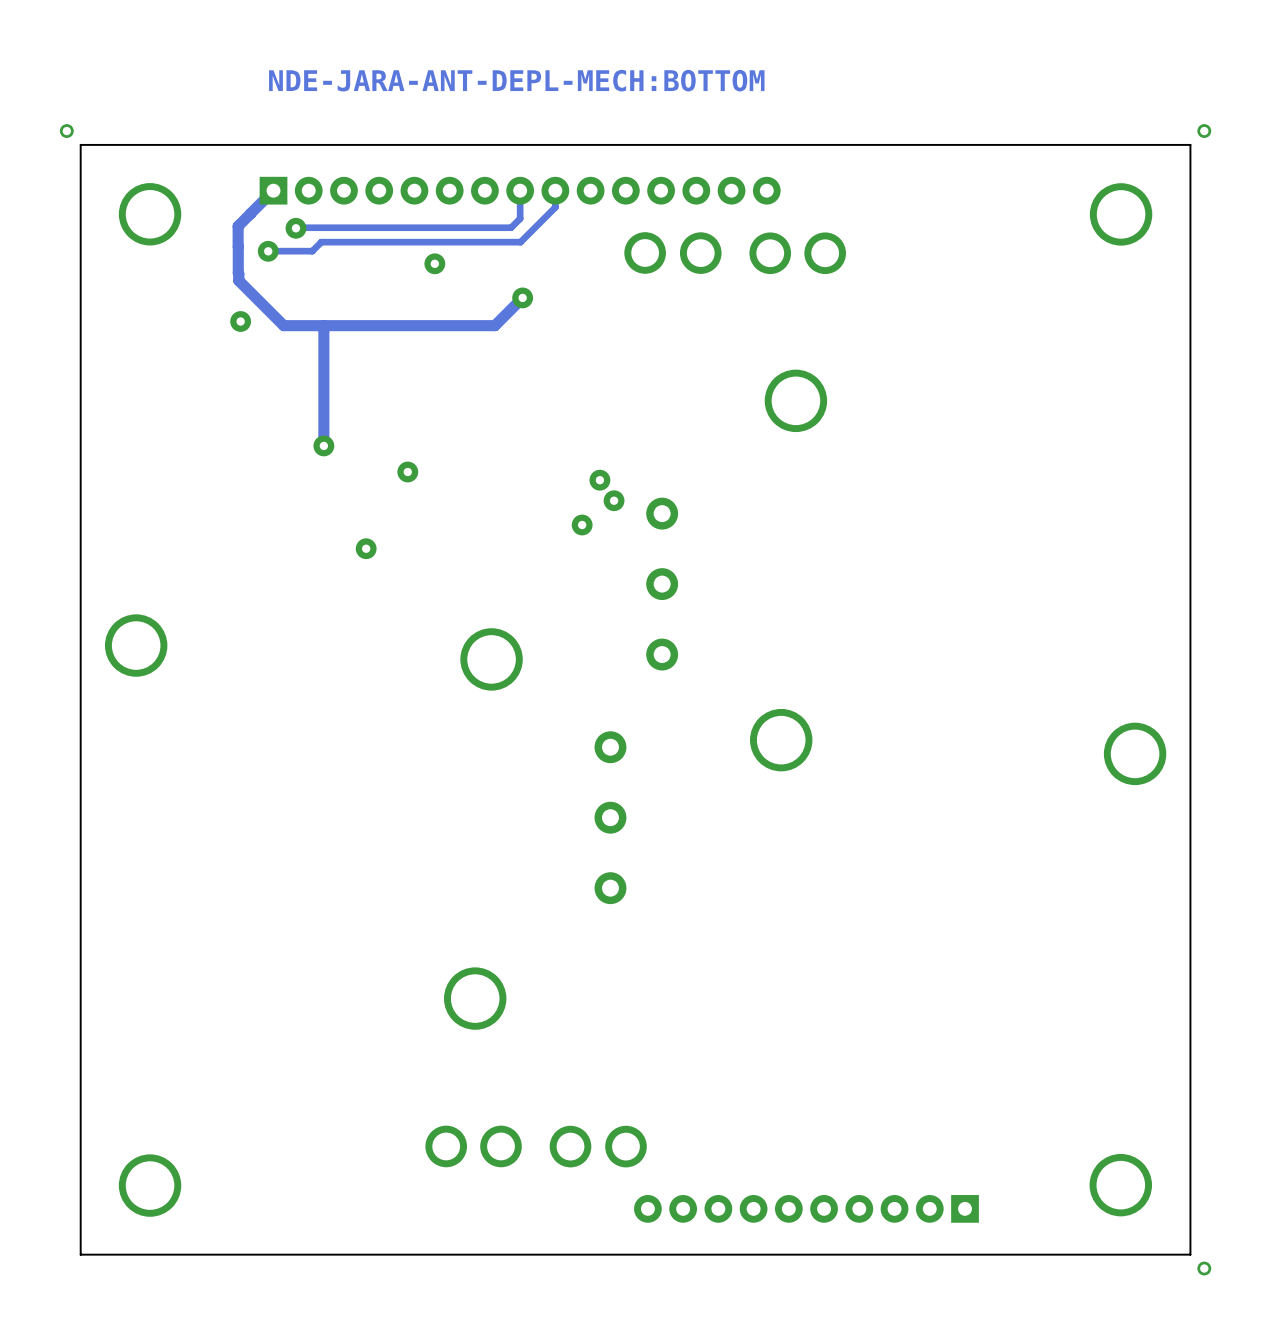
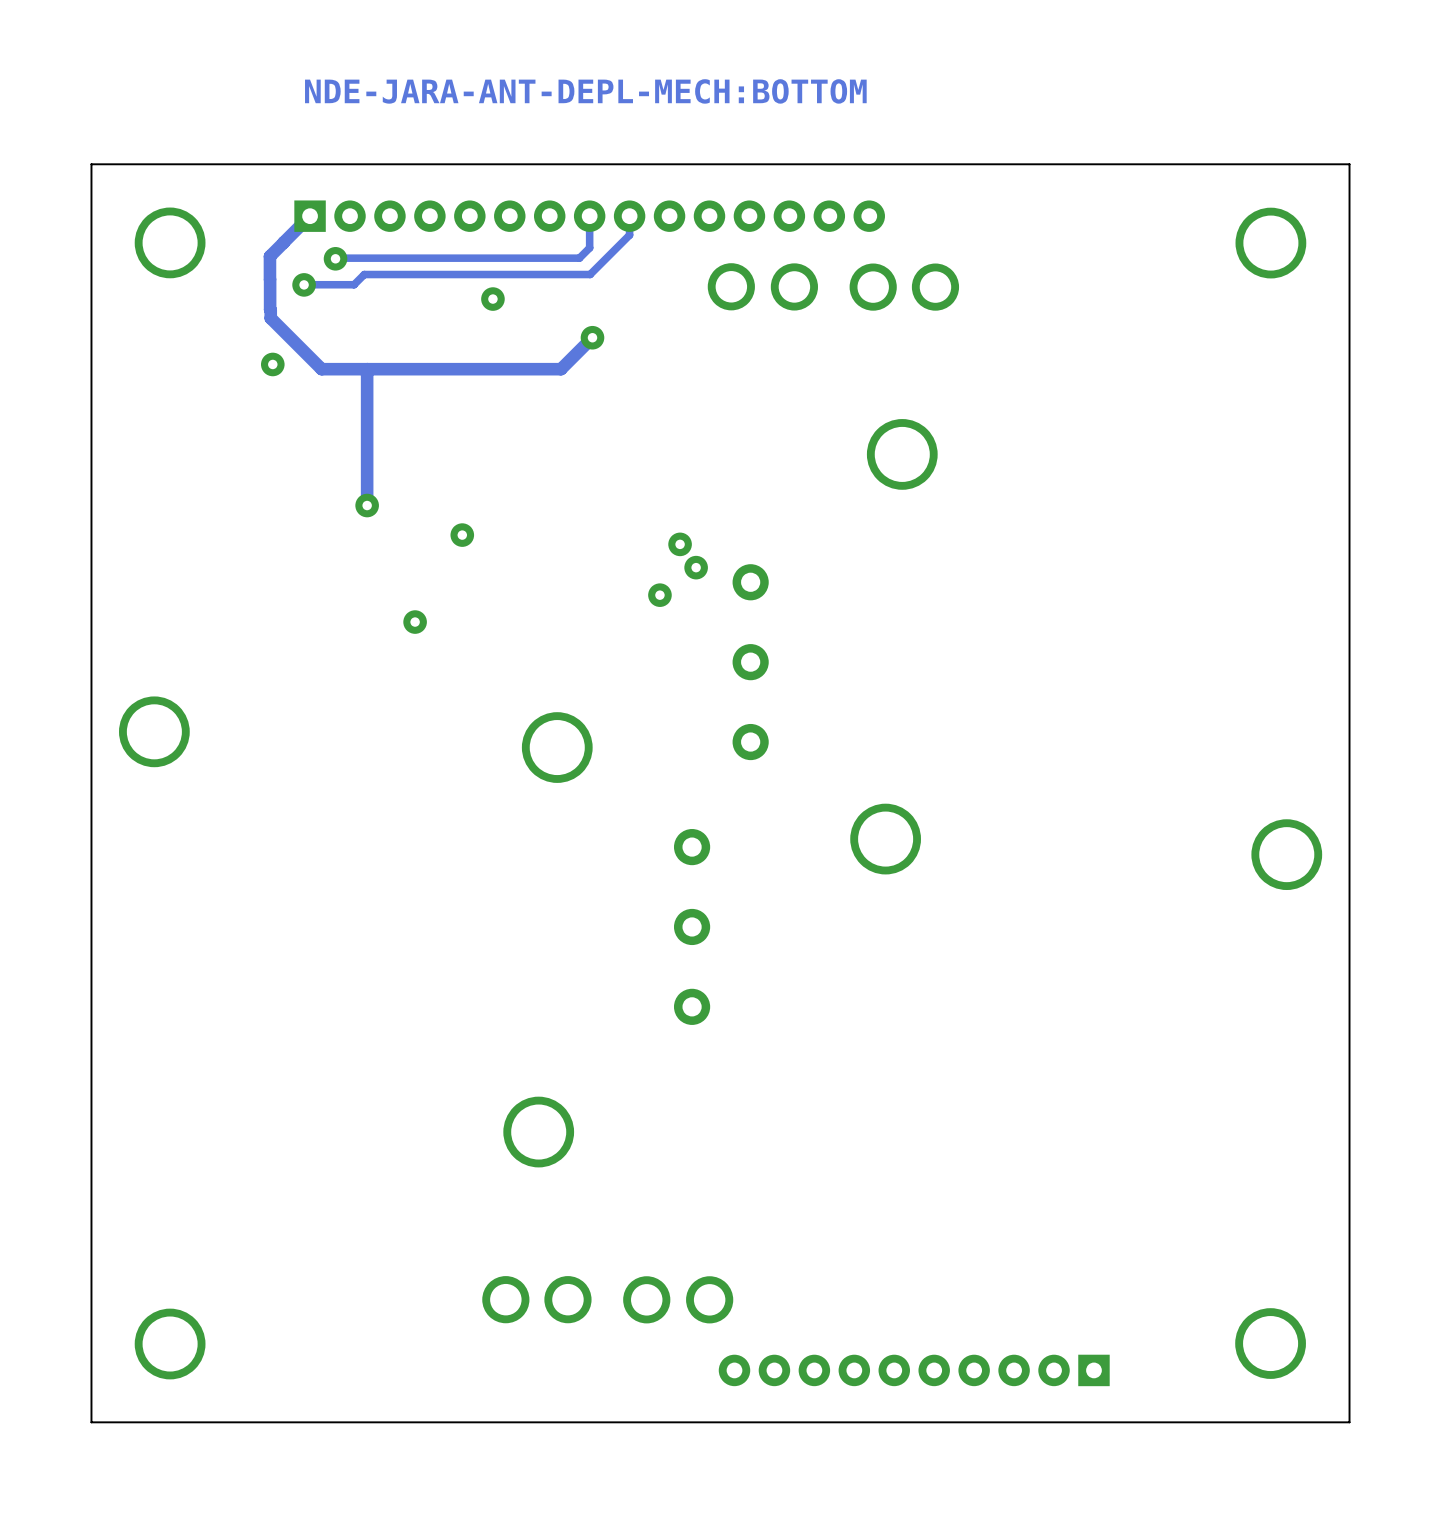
via: (66, 131) -> none
via: (1204, 131) -> none
via: (1204, 1268) -> none

